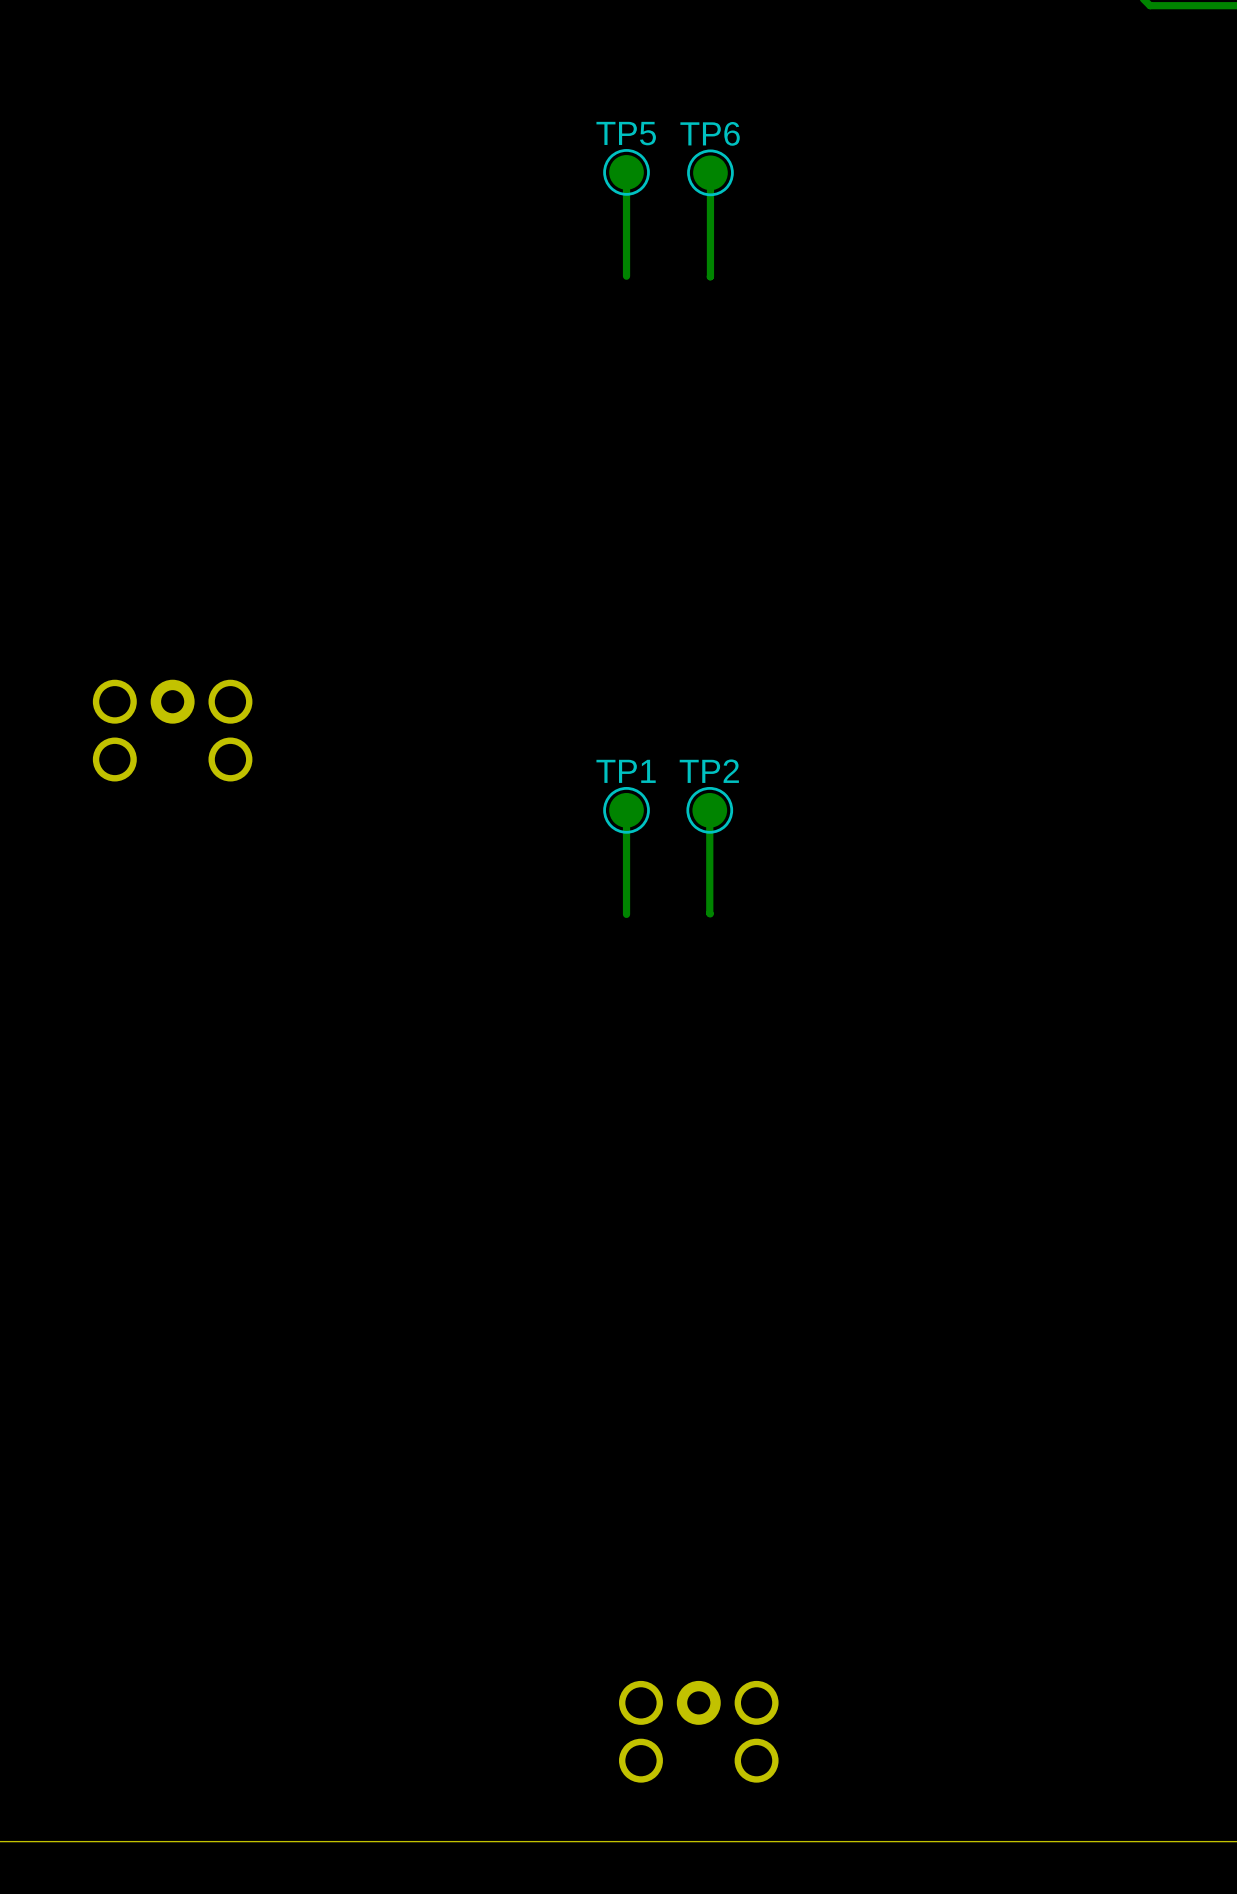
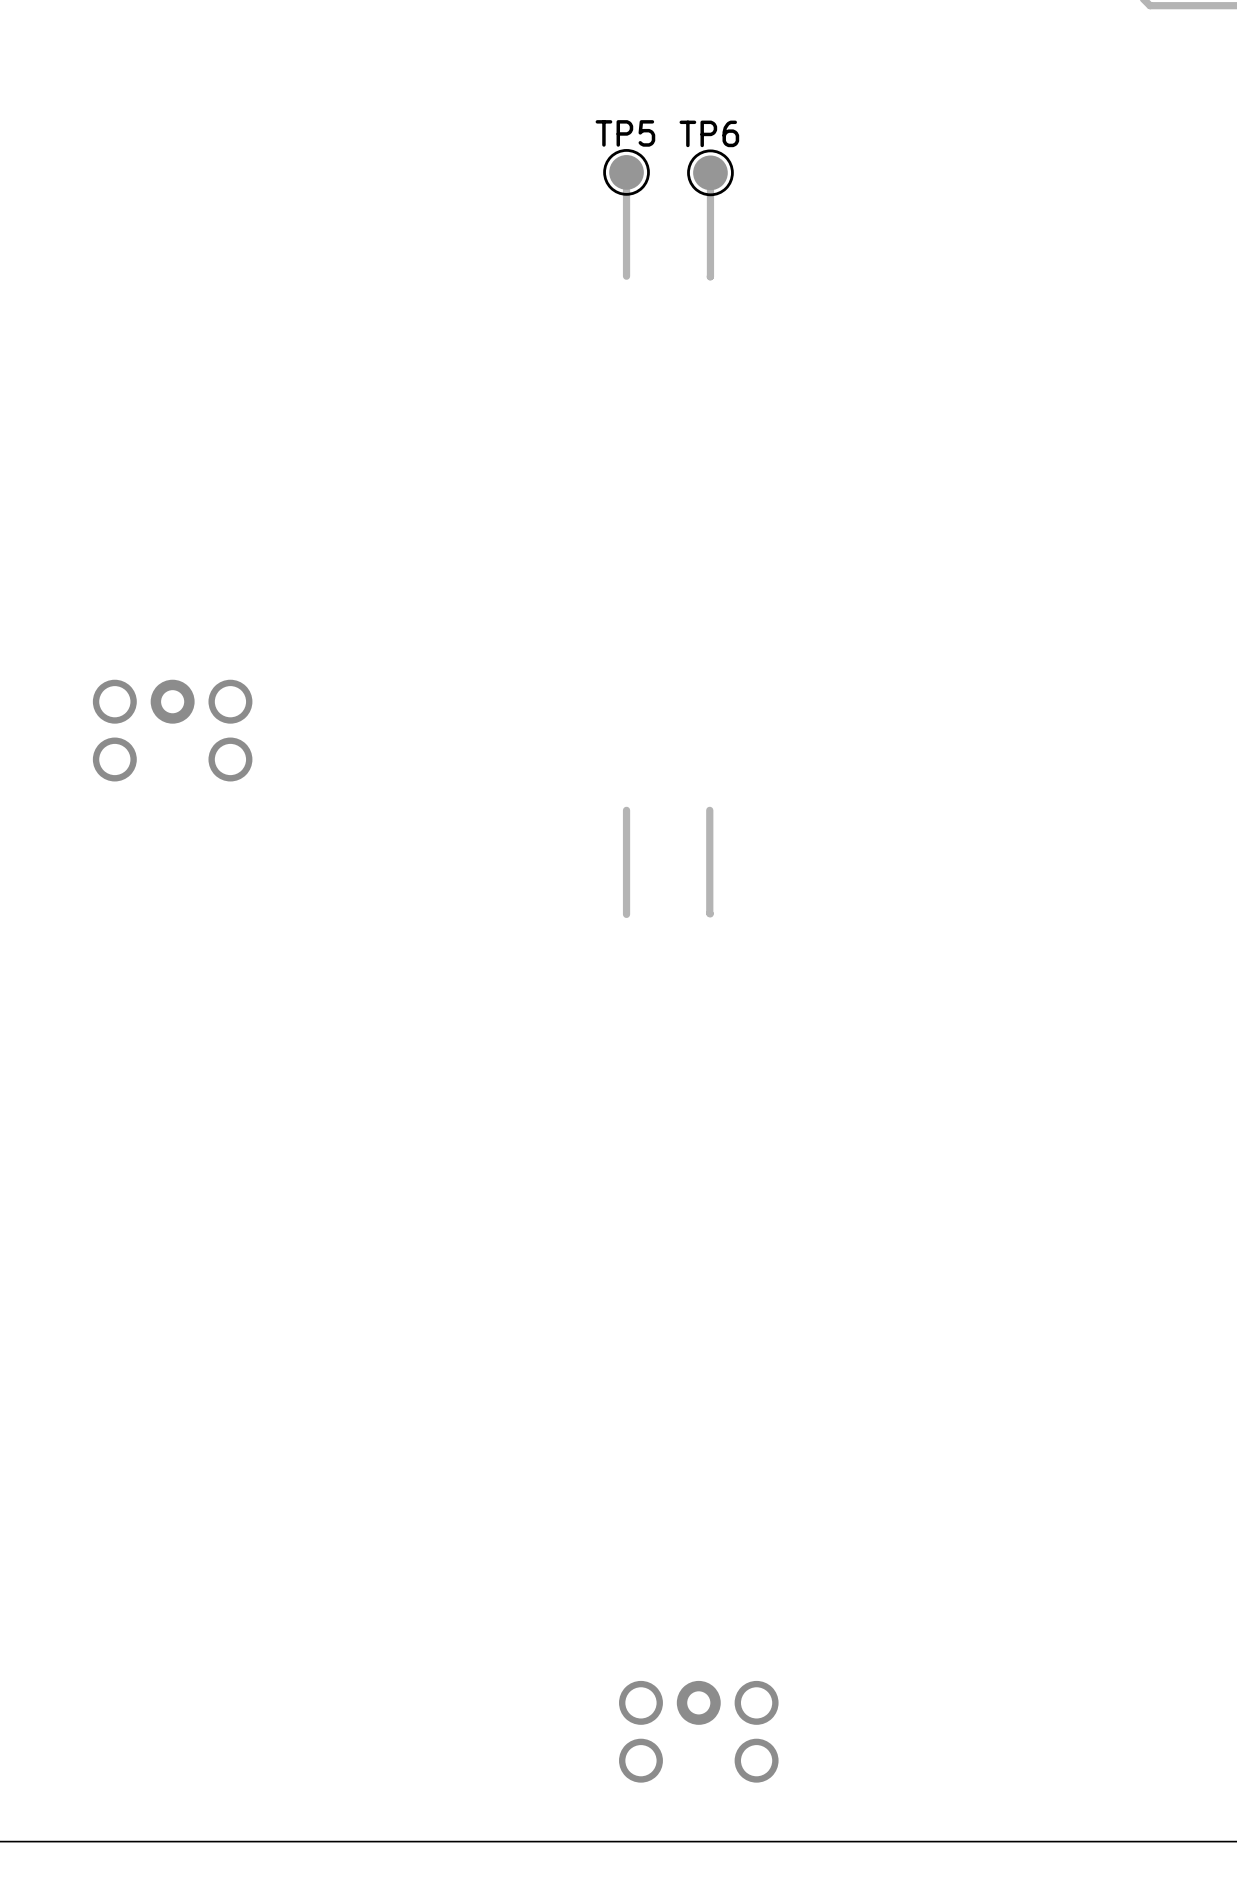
TP1: (626, 810) -> none
TP2: (709, 810) -> none

